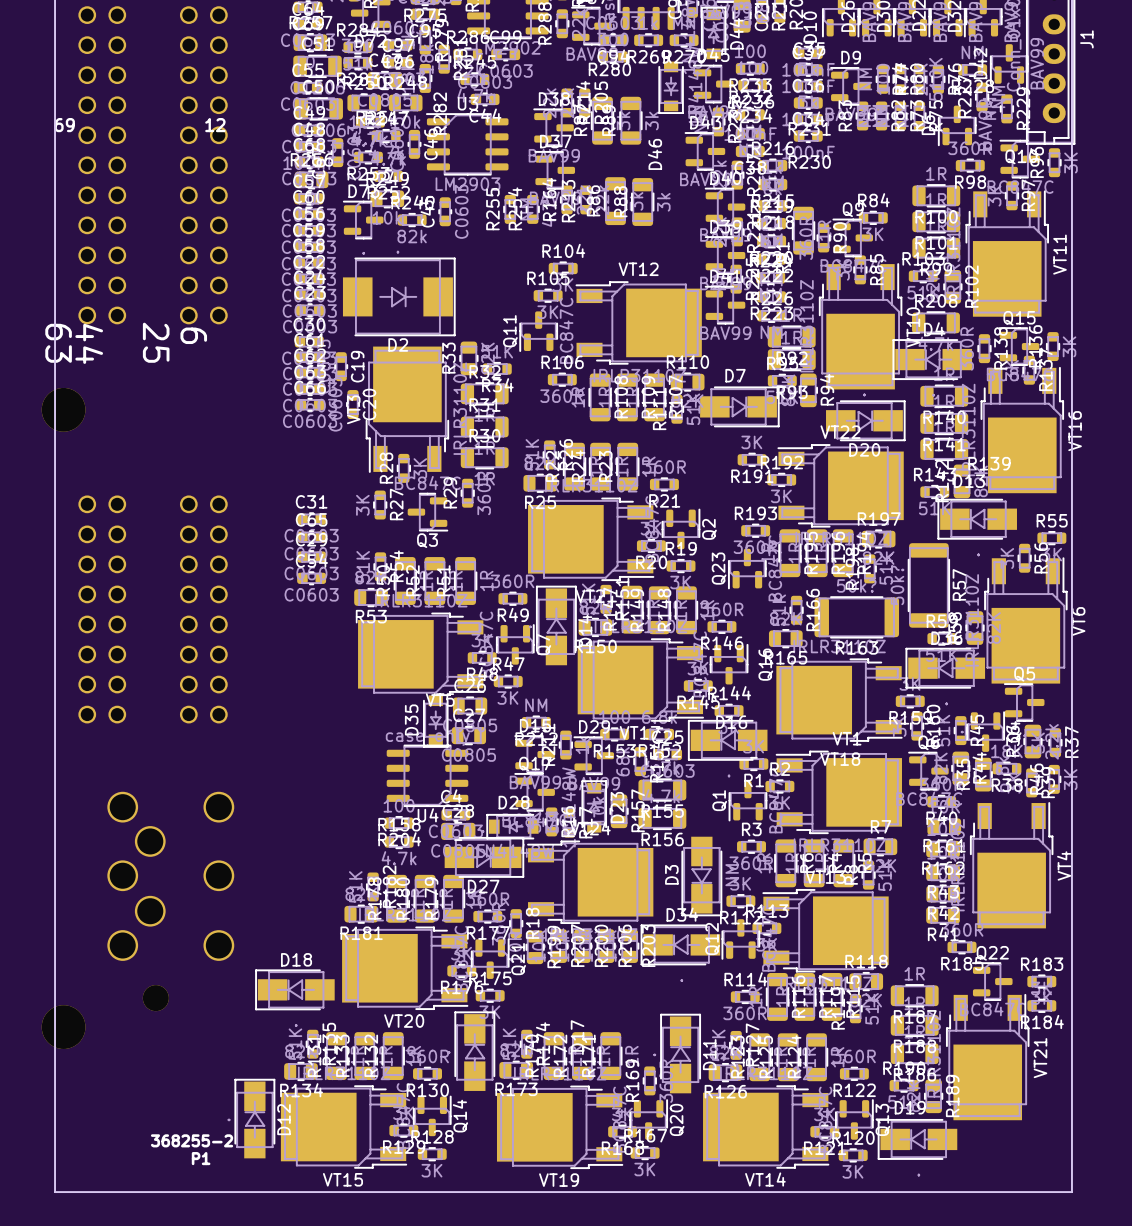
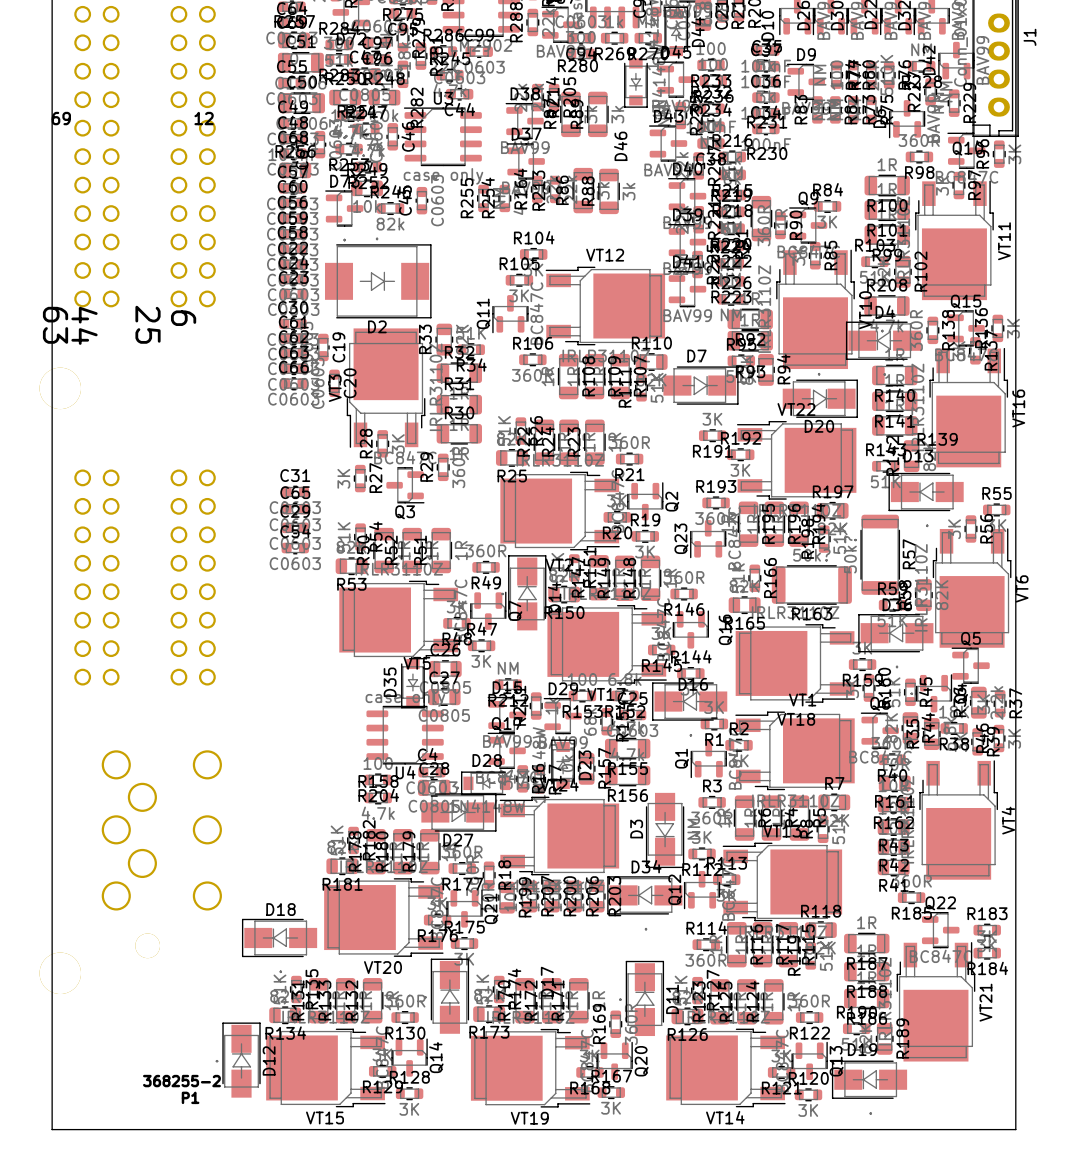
U3 value: LM2903 (467, 184) -> case only (443, 176)

